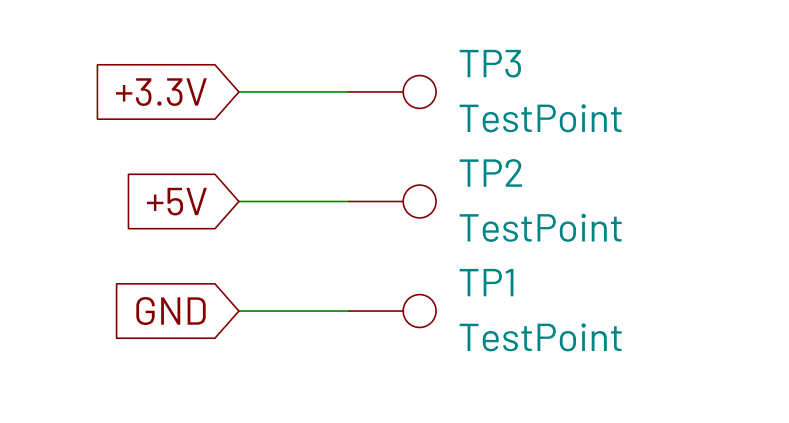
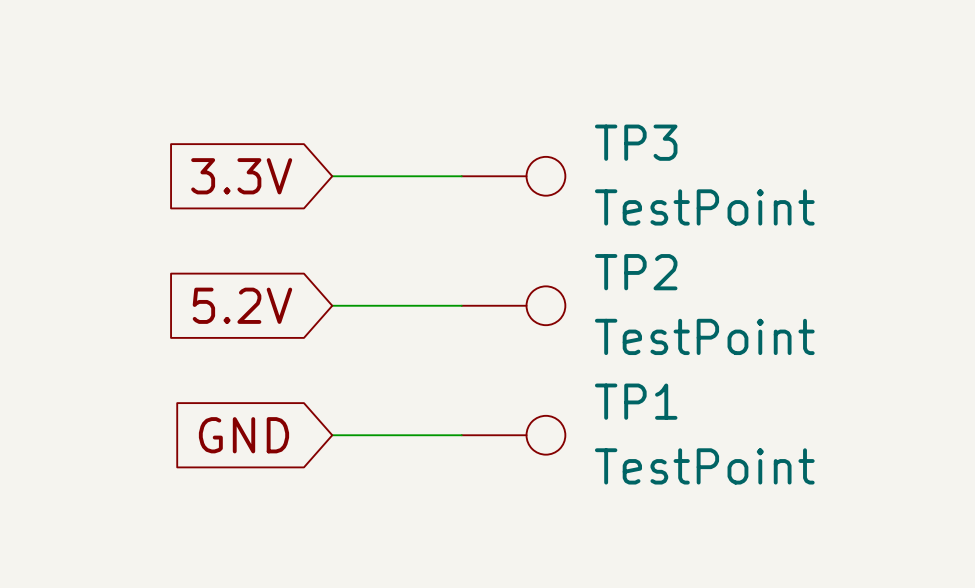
global label: +3.3V (161, 92) -> 3.3V (241, 176)
global label: +5V (176, 201) -> 5.2V (242, 305)

